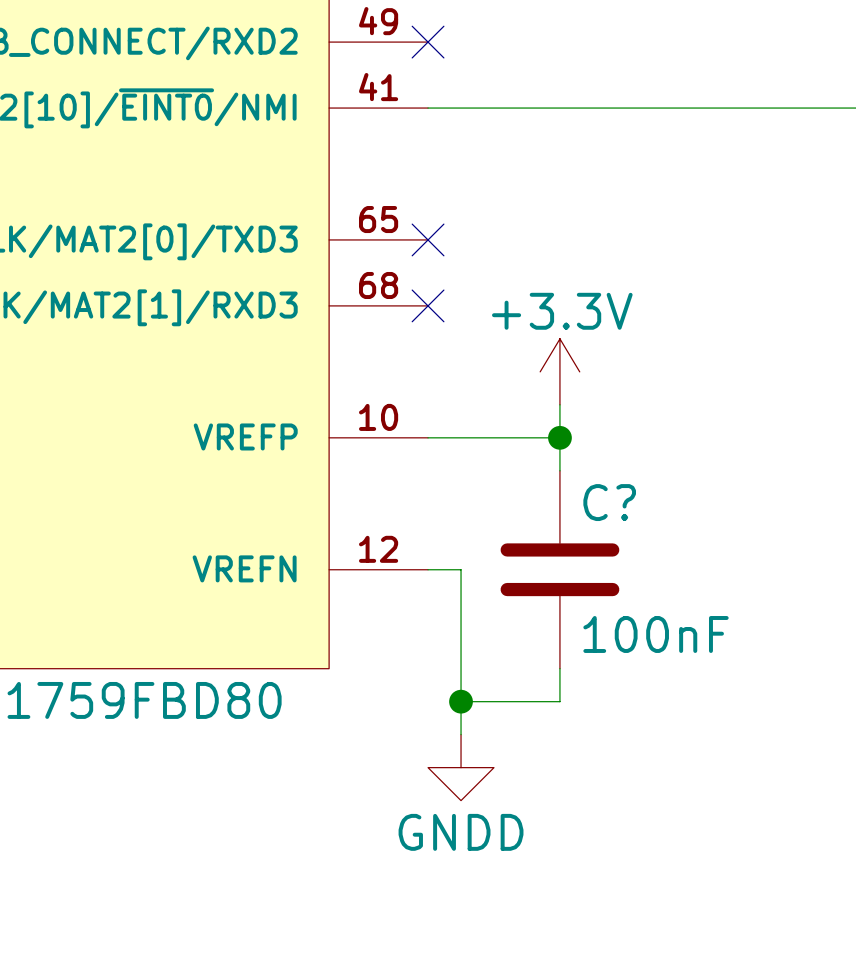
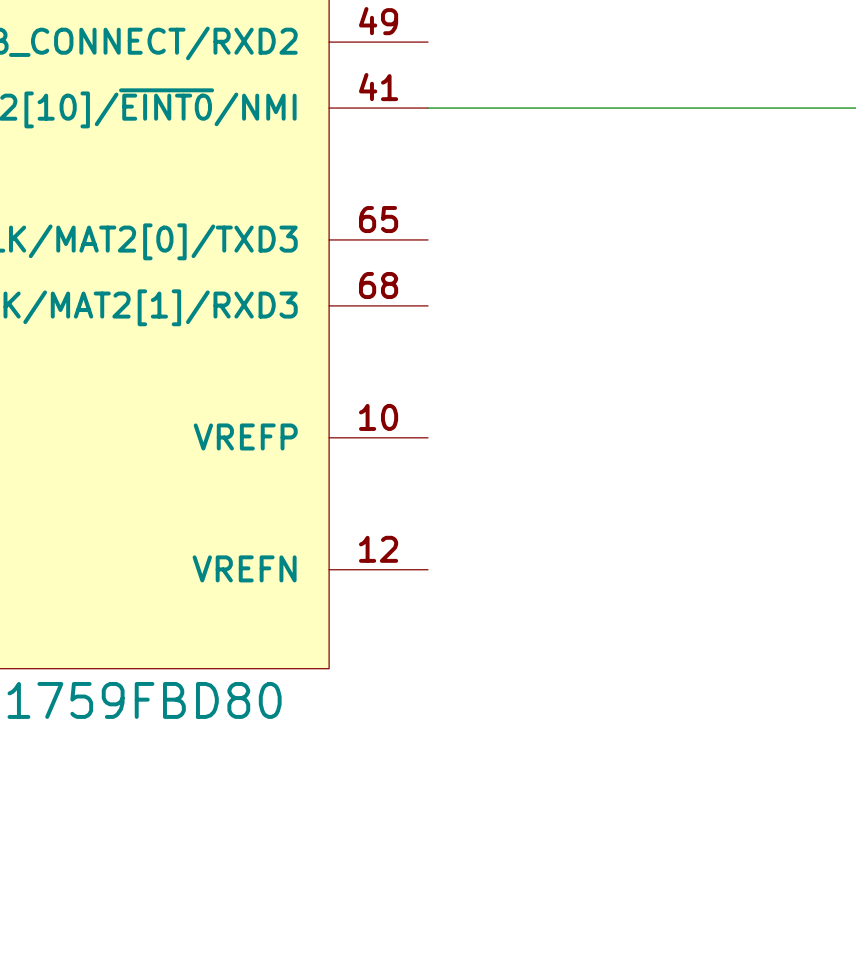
no-connect mark: (428, 42) -> none
no-connect mark: (428, 239) -> none
no-connect mark: (428, 305) -> none
power symbol: +3.3V (559, 371) -> none
wire: (559, 404) (559, 470) -> none
wire: (428, 437) (559, 437) -> none
junction: (559, 437) -> none
wire: (428, 569) (461, 569) (461, 734) -> none
C?: 100nF (559, 569) -> none
wire: (559, 668) (559, 701) (461, 701) -> none
junction: (461, 701) -> none
power symbol: GNDD (461, 767) -> none

